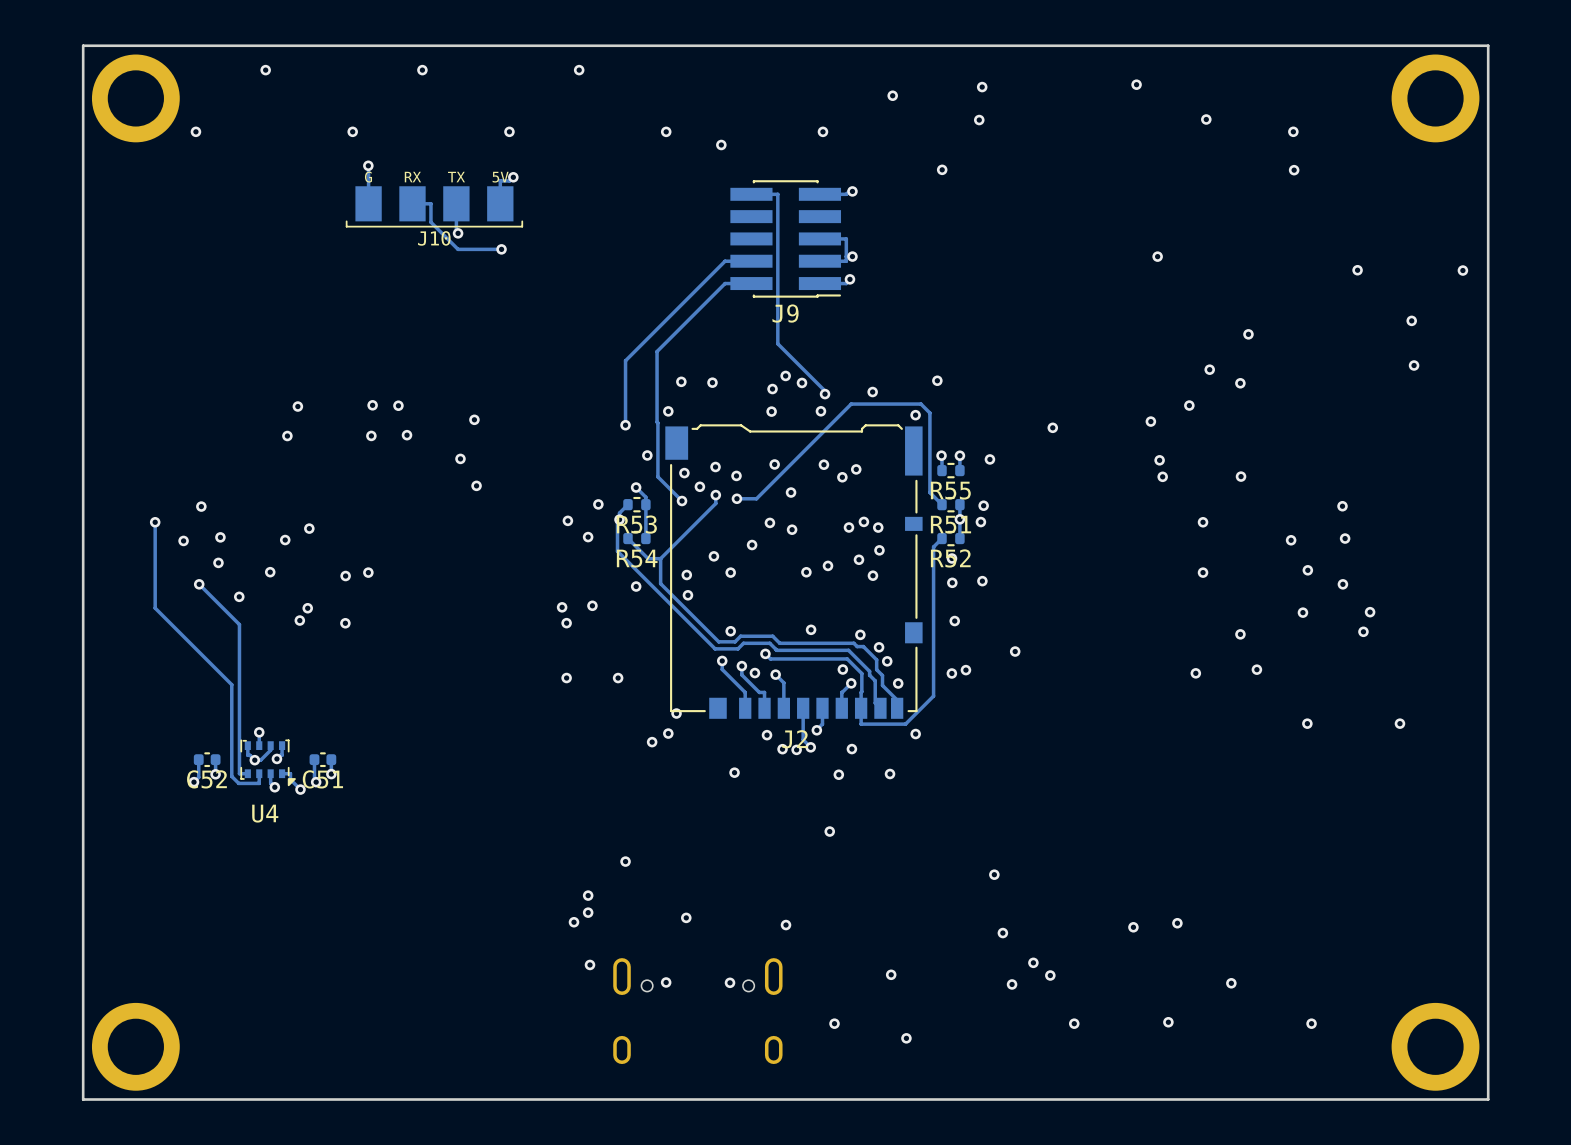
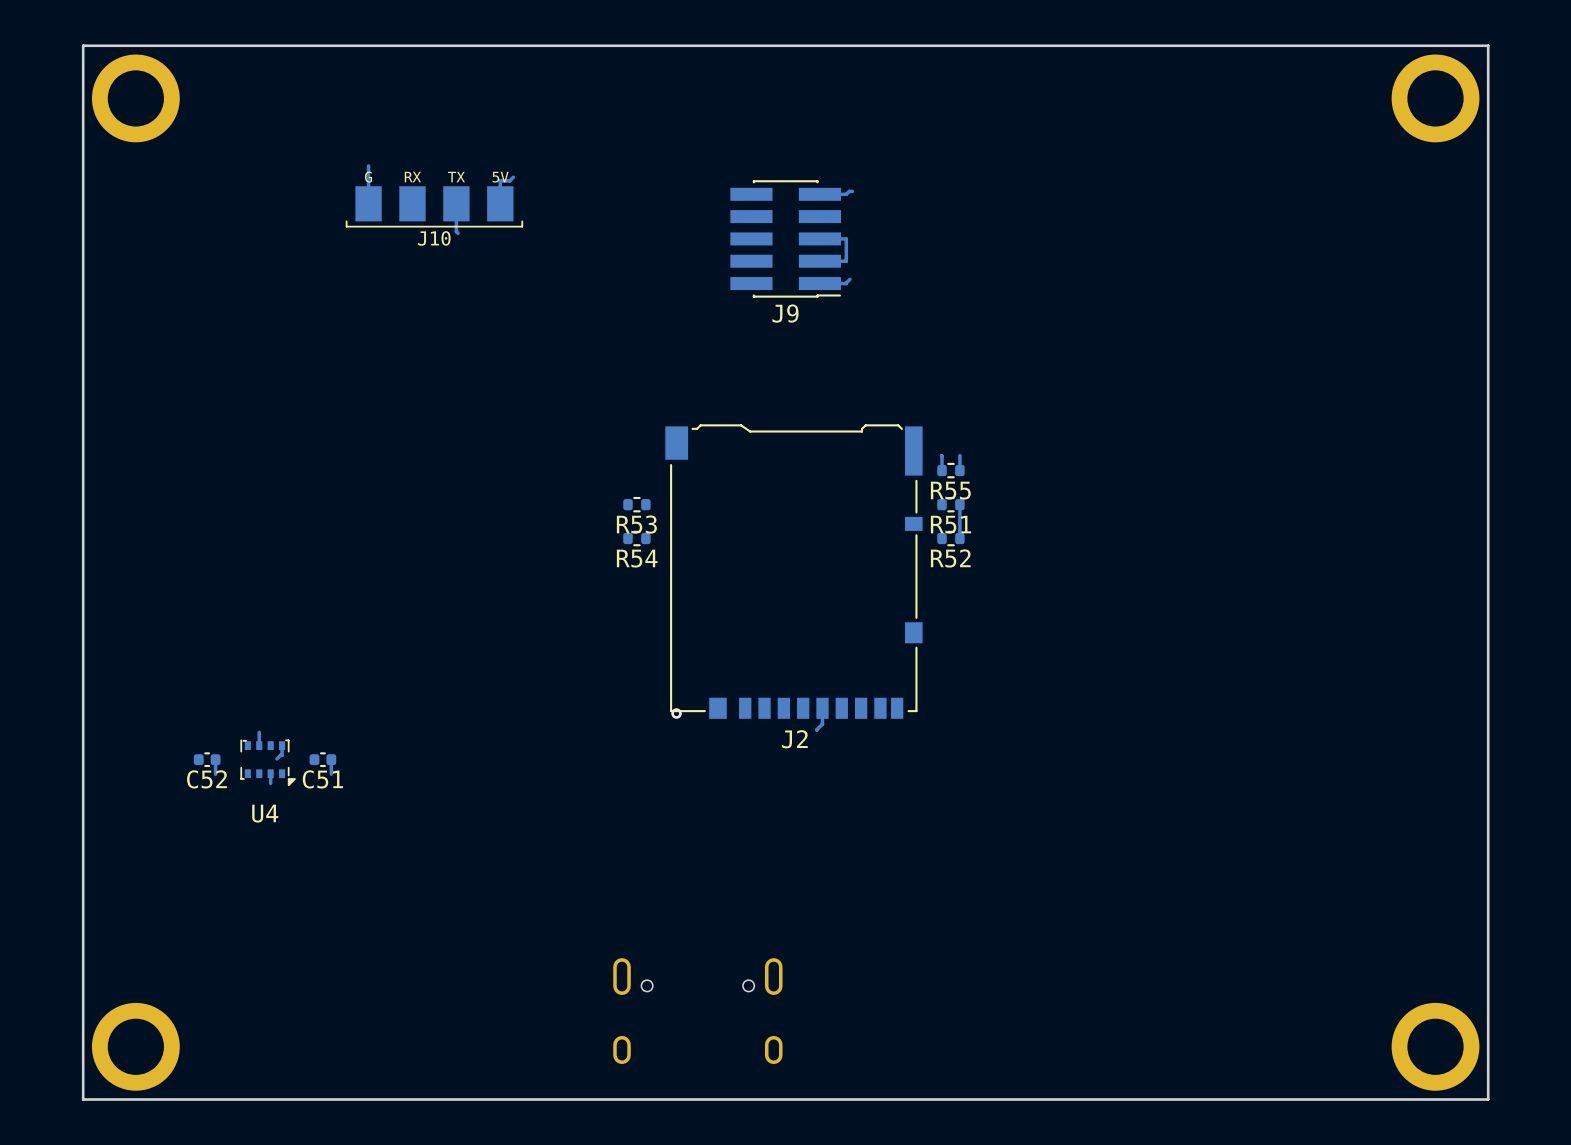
via: (265, 70) -> none
via: (422, 70) -> none
via: (579, 70) -> none
via: (1136, 84) -> none
via: (982, 87) -> none
via: (892, 95) -> none
via: (1206, 119) -> none
via: (979, 120) -> none
via: (195, 131) -> none
via: (352, 131) -> none
via: (509, 131) -> none
via: (666, 131) -> none
via: (822, 131) -> none
via: (1293, 131) -> none
via: (721, 144) -> none
via: (368, 165) -> none
via: (942, 169) -> none
via: (1294, 170) -> none
via: (513, 177) -> none
via: (852, 191) -> none
track: (751, 194) (777, 194) (777, 343) (825, 391) (825, 394) -> none
track: (412, 203) (430, 203) (430, 222) (458, 249) (501, 249) -> none
via: (458, 233) -> none
via: (501, 249) -> none
via: (852, 256) -> none
via: (1157, 256) -> none
track: (751, 261) (725, 261) (625, 360) (625, 425) -> none
via: (1357, 270) -> none
via: (1462, 270) -> none
via: (849, 279) -> none
track: (751, 283) (725, 283) (657, 351) (657, 476) (682, 501) -> none
via: (1411, 320) -> none
via: (1248, 334) -> none
via: (1414, 365) -> none
via: (1209, 369) -> none
via: (785, 375) -> none
via: (937, 380) -> none
via: (681, 381) -> none
via: (712, 382) -> none
via: (801, 382) -> none
via: (1240, 383) -> none
via: (772, 389) -> none
via: (872, 392) -> none
via: (825, 394) -> none
via: (372, 405) -> none
via: (398, 405) -> none
via: (1189, 405) -> none
via: (297, 406) -> none
via: (668, 411) -> none
via: (771, 411) -> none
via: (820, 411) -> none
via: (915, 415) -> none
via: (474, 419) -> none
via: (1150, 421) -> none
via: (625, 425) -> none
via: (1052, 427) -> none
via: (371, 435) -> none
via: (407, 435) -> none
via: (287, 436) -> none
via: (647, 455) -> none
via: (941, 455) -> none
via: (959, 455) -> none
via: (460, 458) -> none
via: (989, 459) -> none
via: (1159, 460) -> none
via: (774, 464) -> none
via: (823, 464) -> none
via: (715, 467) -> none
via: (856, 469) -> none
via: (684, 473) -> none
via: (736, 475) -> none
via: (1162, 476) -> none
via: (1241, 476) -> none
via: (842, 477) -> none
via: (476, 485) -> none
via: (699, 486) -> none
track: (636, 487) (645, 497) (645, 538) -> none
via: (636, 487) -> none
via: (791, 492) -> none
track: (715, 495) (715, 503) (660, 558) -> none
via: (715, 495) -> none
track: (736, 498) (756, 498) (851, 404) (920, 404) (929, 413) (929, 492) (942, 504) -> none
via: (736, 498) -> none
via: (682, 501) -> none
via: (598, 504) -> none
track: (627, 504) (619, 513) (617, 521) (617, 551) (715, 648) (737, 648) (743, 643) (769, 643) (776, 650) (848, 650) (869, 671) (869, 675) (875, 680) (875, 703) (880, 708) -> none
via: (983, 505) -> none
via: (201, 506) -> none
via: (1342, 506) -> none
via: (619, 519) -> none
via: (959, 519) -> none
via: (567, 520) -> none
via: (863, 521) -> none
track: (155, 522) (155, 608) (231, 684) (231, 776) (238, 783) (259, 783) (259, 773) -> none
via: (155, 522) -> none
via: (769, 522) -> none
via: (980, 522) -> none
via: (1203, 522) -> none
via: (848, 527) -> none
via: (878, 527) -> none
via: (309, 528) -> none
via: (792, 529) -> none
via: (220, 537) -> none
via: (588, 537) -> none
track: (627, 538) (648, 558) (660, 558) -> none
track: (942, 538) (933, 546) (933, 696) (905, 724) (861, 724) (861, 673) (847, 658) (770, 658) (765, 653) -> none
via: (1345, 538) -> none
via: (183, 540) -> none
via: (285, 540) -> none
via: (1291, 540) -> none
via: (752, 545) -> none
via: (879, 550) -> none
via: (713, 556) -> none
track: (660, 558) (660, 583) (718, 641) (735, 641) (740, 636) (772, 636) (779, 643) (853, 643) (857, 646) (863, 646) (876, 659) (876, 669) (882, 675) (882, 685) (897, 700) (897, 708) -> none
via: (951, 558) -> none
via: (858, 559) -> none
via: (218, 562) -> none
via: (827, 565) -> none
via: (1307, 570) -> none
via: (270, 572) -> none
via: (368, 572) -> none
via: (730, 572) -> none
via: (806, 572) -> none
via: (1203, 572) -> none
via: (686, 575) -> none
via: (872, 575) -> none
via: (345, 576) -> none
via: (982, 581) -> none
via: (952, 582) -> none
track: (199, 584) (239, 624) (239, 773) (247, 773) -> none
via: (199, 584) -> none
via: (1342, 584) -> none
via: (636, 586) -> none
via: (687, 595) -> none
via: (239, 596) -> none
via: (592, 605) -> none
via: (562, 607) -> none
via: (307, 608) -> none
via: (1302, 612) -> none
via: (1370, 612) -> none
via: (299, 620) -> none
via: (954, 621) -> none
via: (345, 623) -> none
via: (566, 623) -> none
via: (811, 629) -> none
via: (730, 631) -> none
via: (1363, 631) -> none
via: (860, 634) -> none
via: (1240, 634) -> none
via: (879, 647) -> none
via: (1015, 651) -> none
via: (765, 653) -> none
track: (722, 660) (722, 669) (745, 692) (745, 708) -> none
via: (722, 660) -> none
via: (887, 661) -> none
track: (741, 666) (741, 674) (759, 692) (764, 692) (764, 708) -> none
via: (741, 666) -> none
via: (842, 669) -> none
via: (1256, 669) -> none
via: (965, 670) -> none
via: (754, 673) -> none
via: (951, 673) -> none
via: (1195, 673) -> none
track: (775, 674) (783, 682) (783, 708) -> none
via: (775, 674) -> none
via: (566, 678) -> none
via: (618, 678) -> none
track: (851, 683) (841, 692) (841, 708) -> none
via: (851, 683) -> none
via: (898, 683) -> none
track: (803, 708) (803, 739) (810, 747) -> none
via: (1307, 723) -> none
via: (1399, 723) -> none
via: (816, 730) -> none
via: (259, 732) -> none
via: (668, 733) -> none
via: (915, 734) -> none
via: (767, 735) -> none
via: (652, 742) -> none
track: (270, 745) (270, 750) (260, 760) (254, 760) (247, 755) (247, 745) -> none
via: (810, 747) -> none
via: (782, 749) -> none
via: (796, 749) -> none
via: (851, 749) -> none
via: (276, 758) -> none
track: (198, 759) (198, 777) (193, 782) -> none
track: (314, 759) (314, 780) (316, 782) -> none
via: (254, 760) -> none
via: (734, 772) -> none
track: (282, 773) (290, 773) (290, 779) (300, 789) -> none
via: (215, 774) -> none
via: (331, 774) -> none
via: (838, 774) -> none
via: (890, 774) -> none
via: (193, 782) -> none
via: (316, 782) -> none
via: (274, 787) -> none
via: (300, 789) -> none
via: (829, 831) -> none
via: (625, 861) -> none
via: (994, 874) -> none
via: (588, 895) -> none
via: (588, 912) -> none
via: (686, 917) -> none
via: (573, 922) -> none
via: (1177, 923) -> none
via: (786, 925) -> none
via: (1133, 927) -> none
via: (1002, 933) -> none
via: (1033, 962) -> none
via: (590, 964) -> none
via: (891, 974) -> none
via: (1050, 975) -> none
via: (666, 982) -> none
via: (730, 982) -> none
via: (1231, 983) -> none
via: (1012, 984) -> none
via: (1168, 1022) -> none
via: (834, 1023) -> none
via: (1074, 1023) -> none
via: (1311, 1023) -> none
via: (906, 1038) -> none

